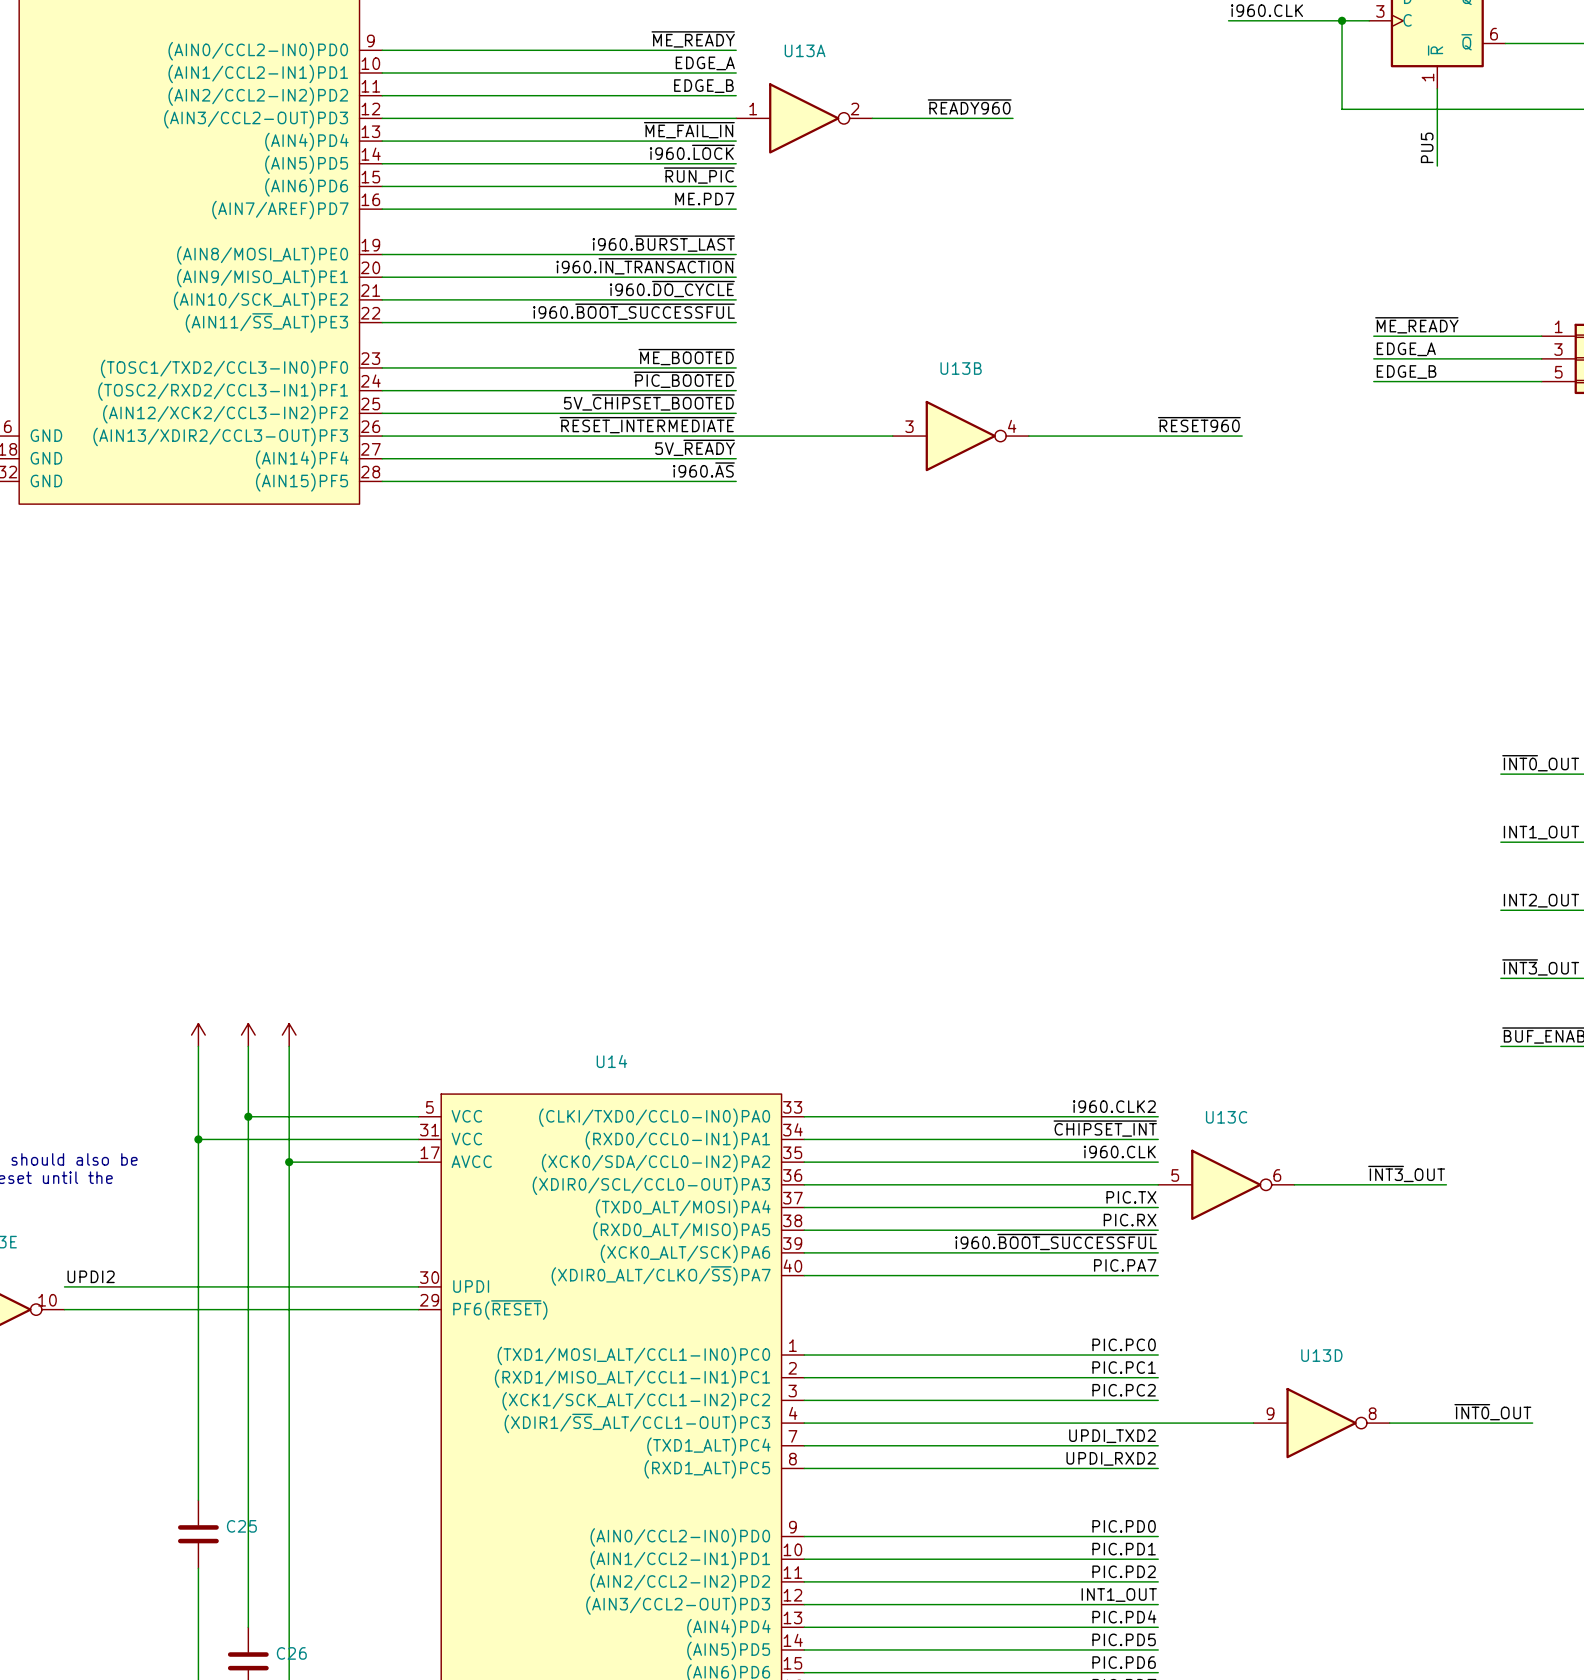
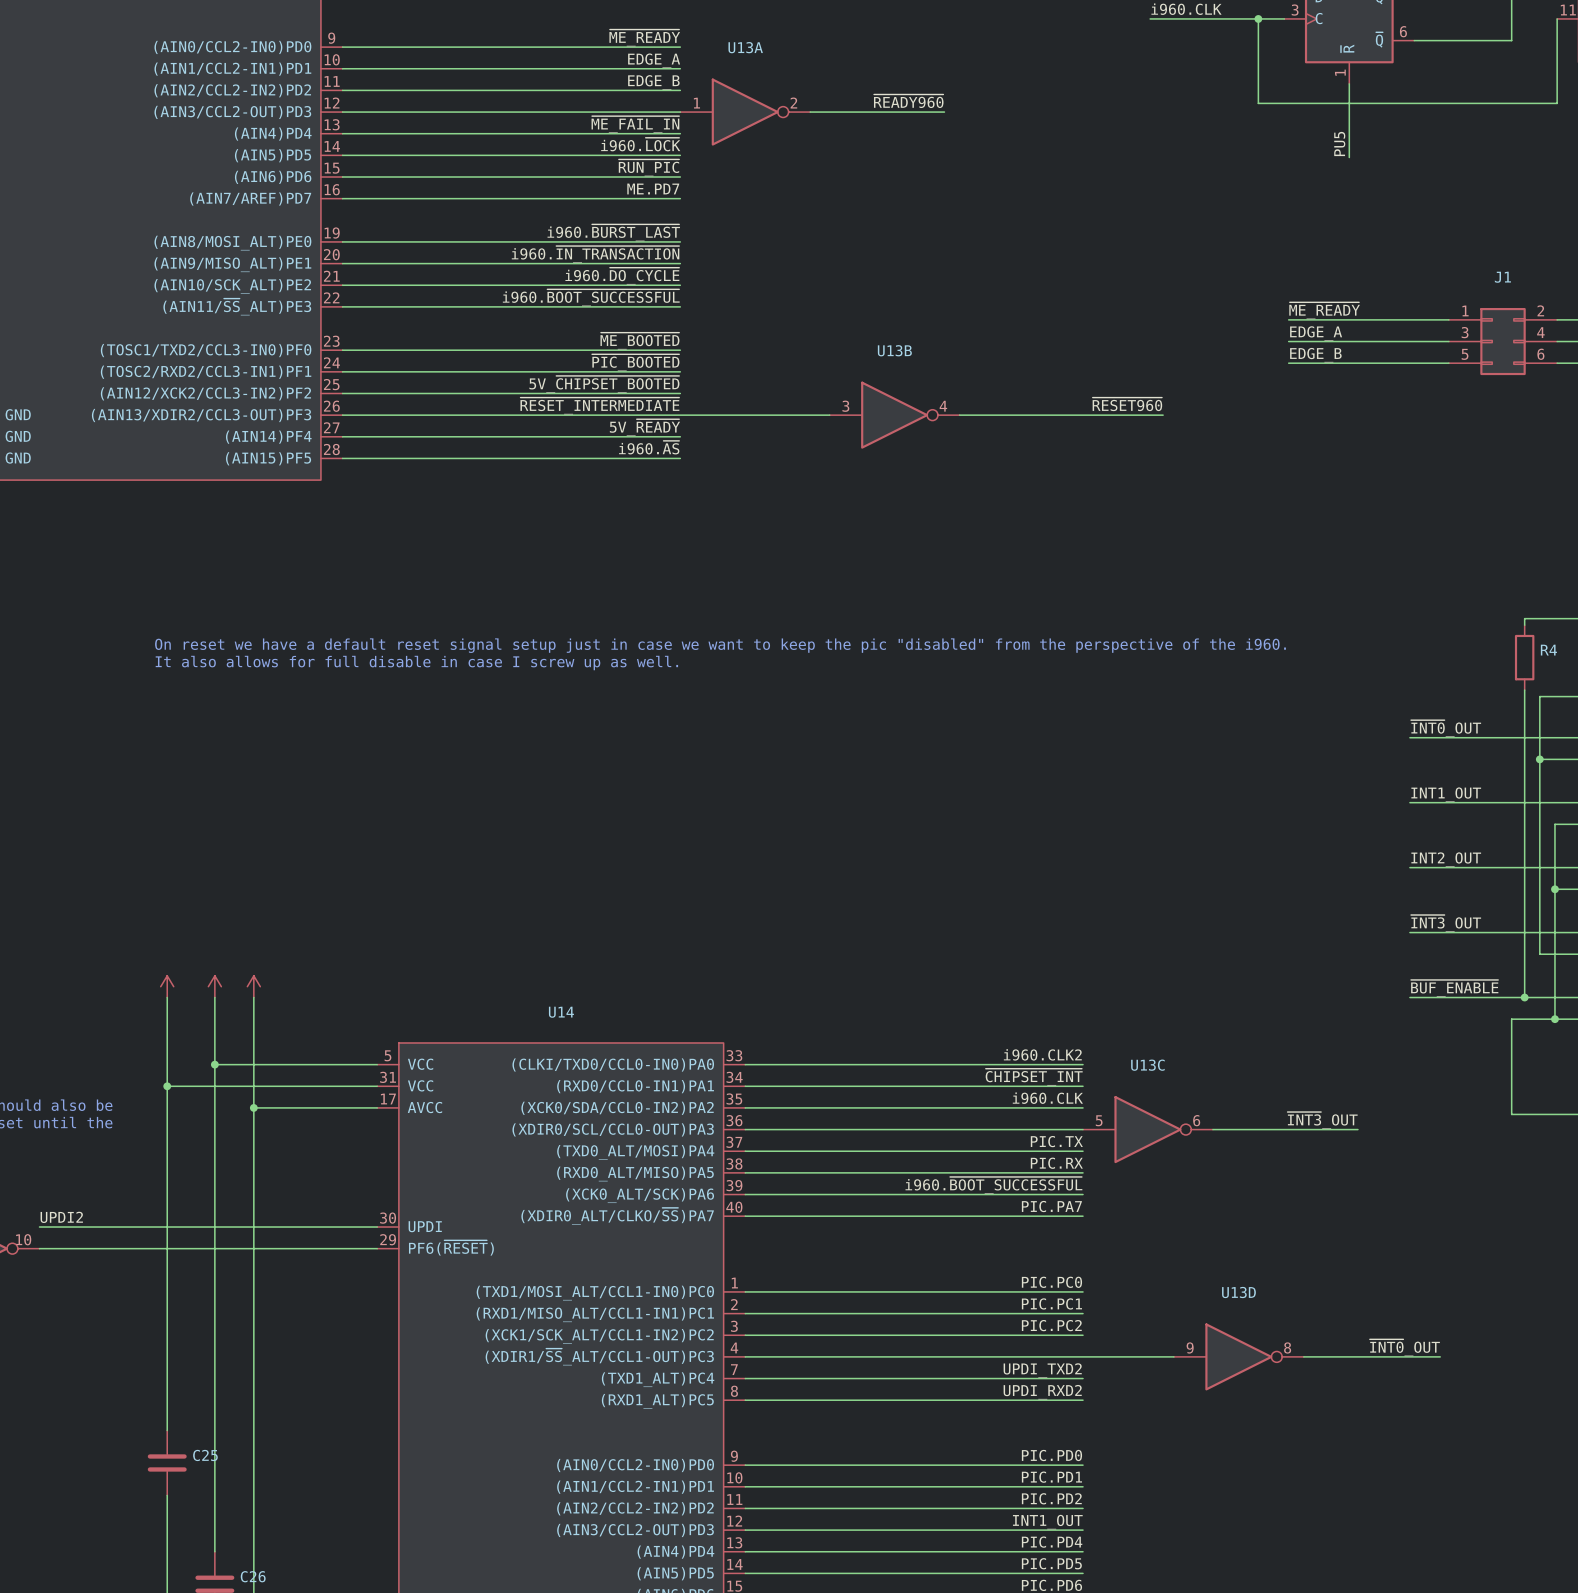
text: none -> On reset we have a default reset signal setup just in case we want to keep the pic "disabled" from the perspective of the i960. (720, 645)
text: none -> It also allows for full disable in case I screw up as well. (416, 663)

